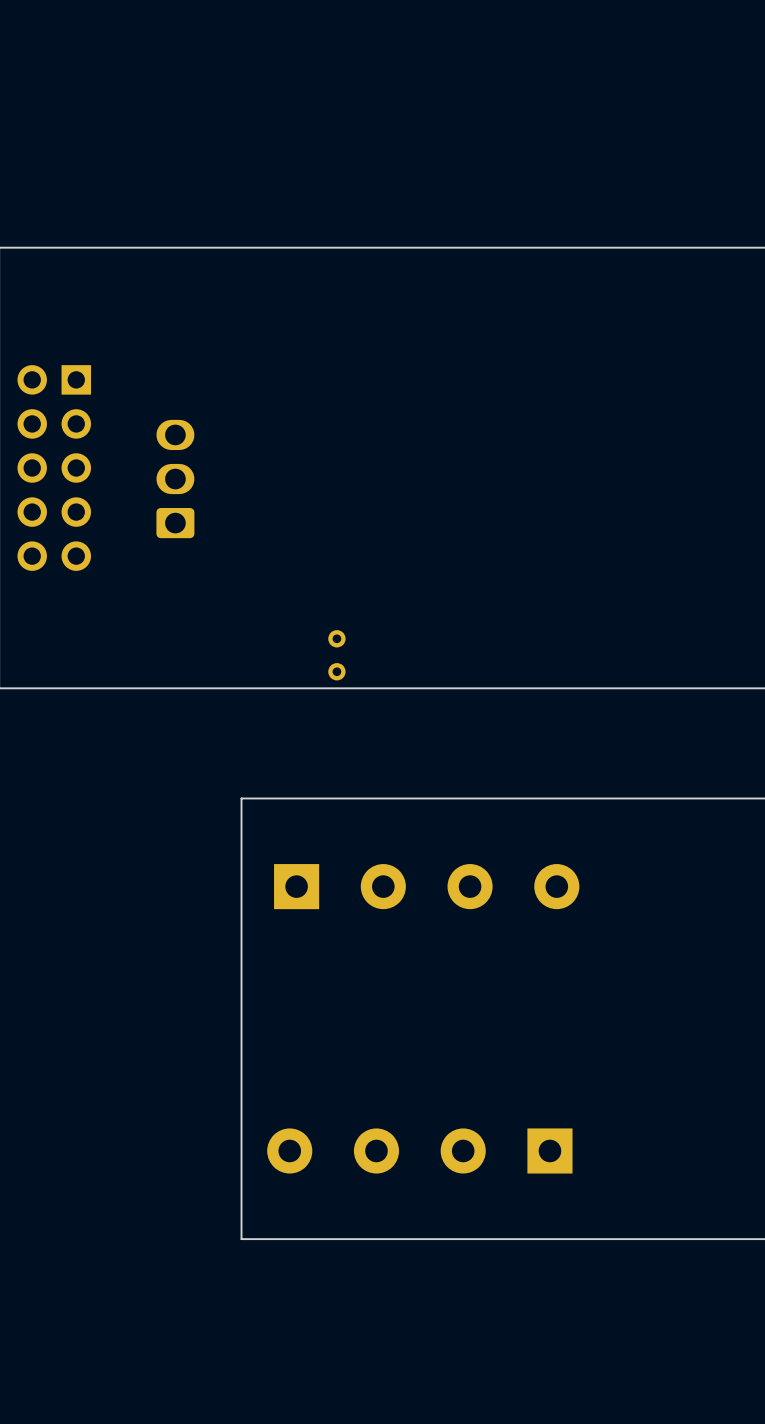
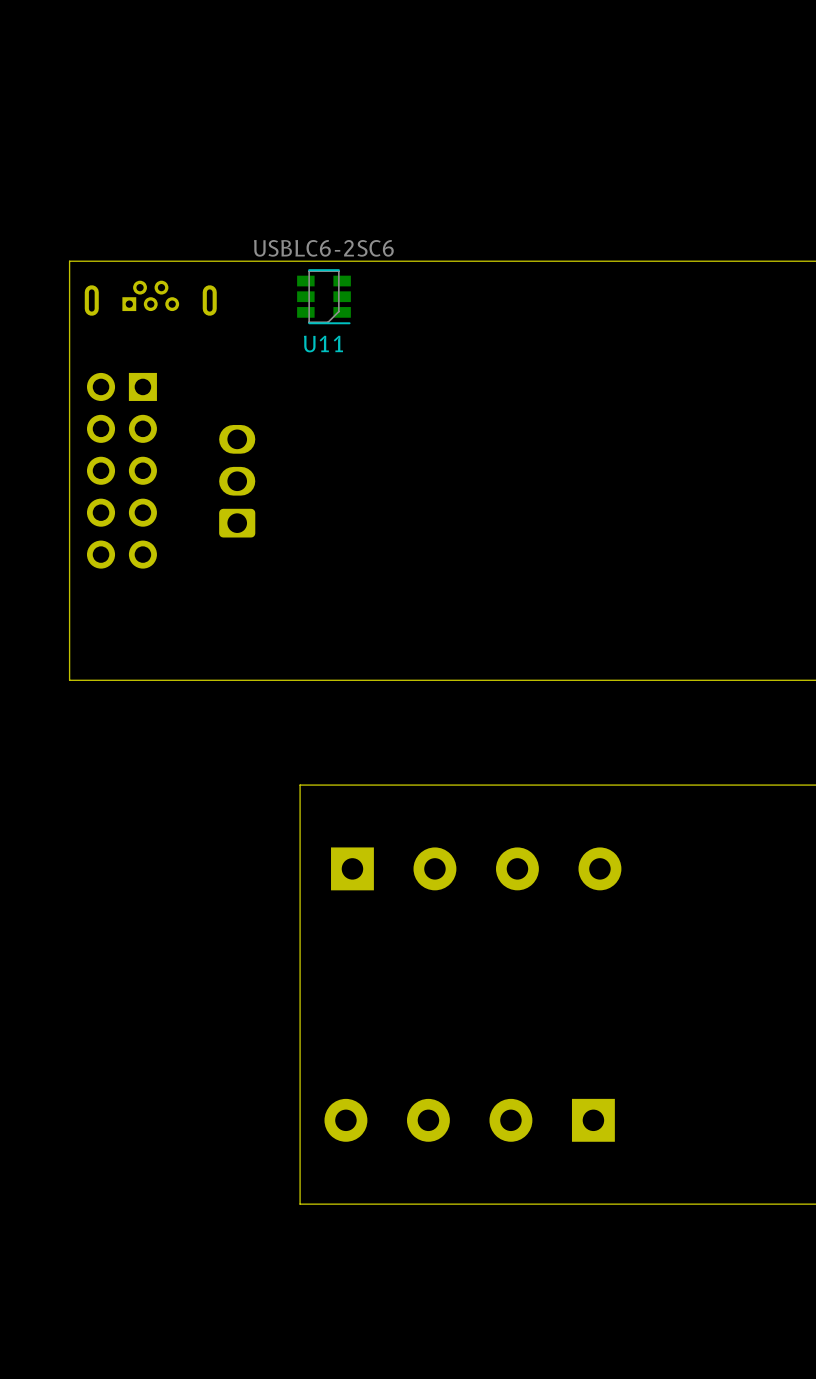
U11: none -> USBLC6-2SC6 (324, 296)
part: none -> (150, 298)
part: (336, 655) -> none

